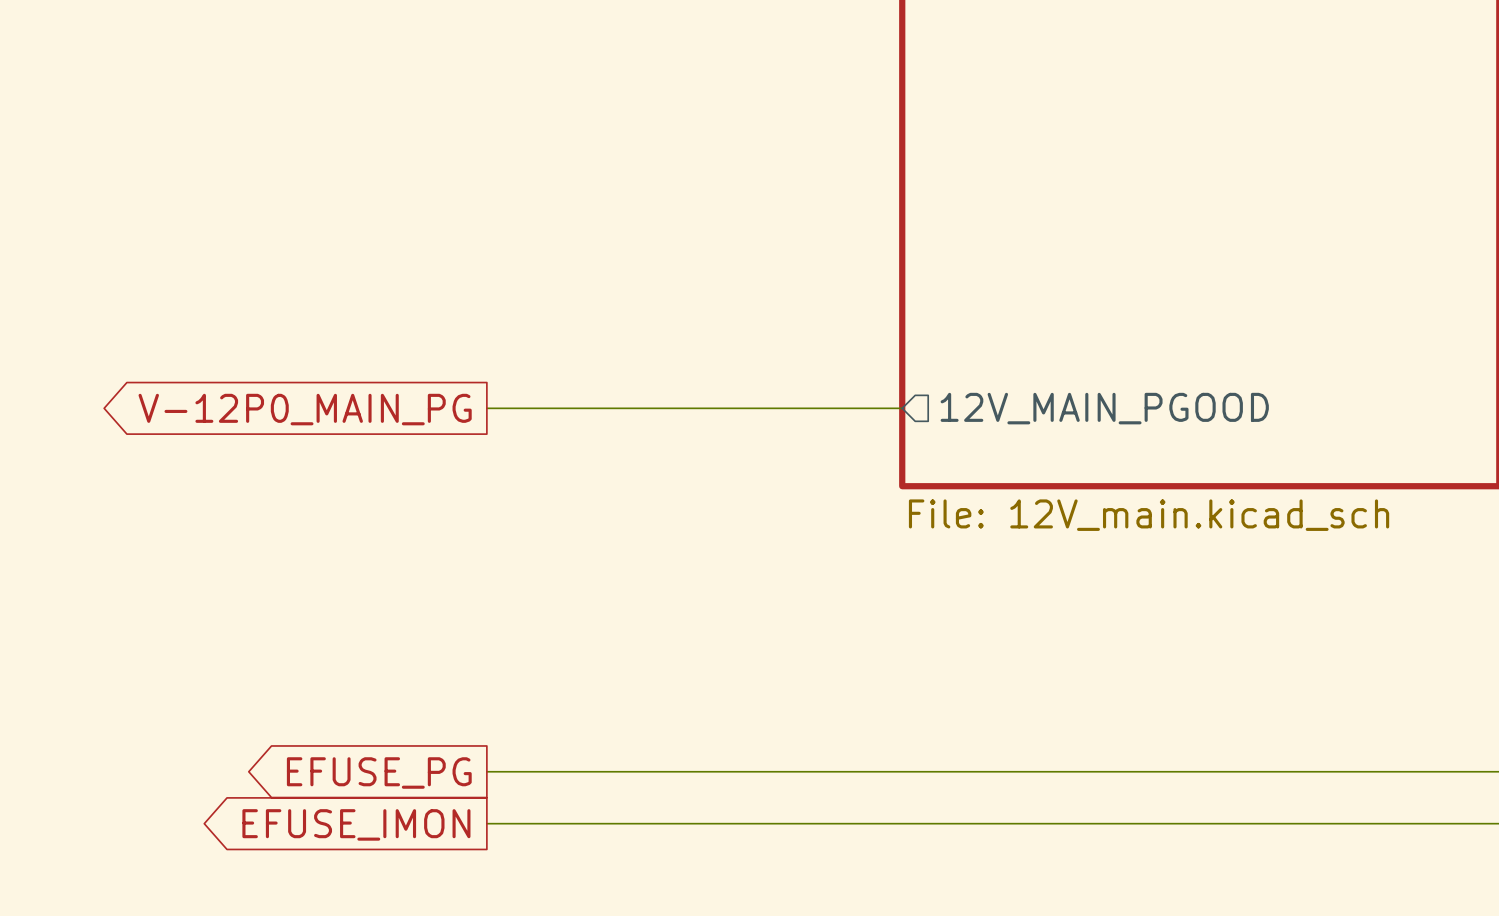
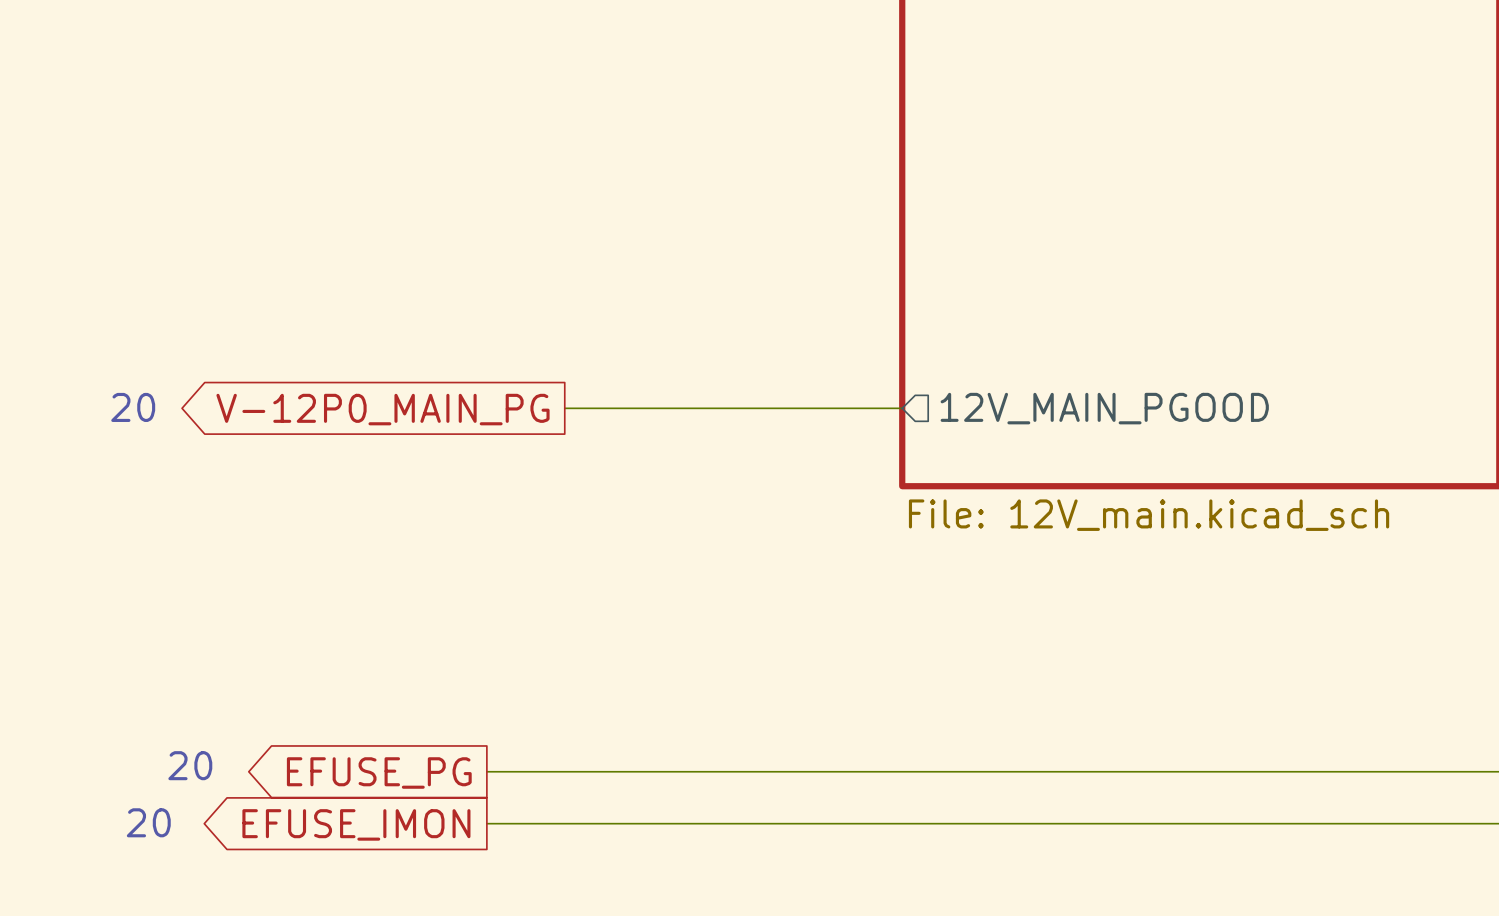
text: none -> 20 (133, 407)
wire: (486, 408) (564, 408) -> none
global label position: V-12P0_MAIN_PG (305, 409) -> V-12P0_MAIN_PG (383, 409)
text: none -> 20 (190, 765)
text: none -> 20 (148, 822)

